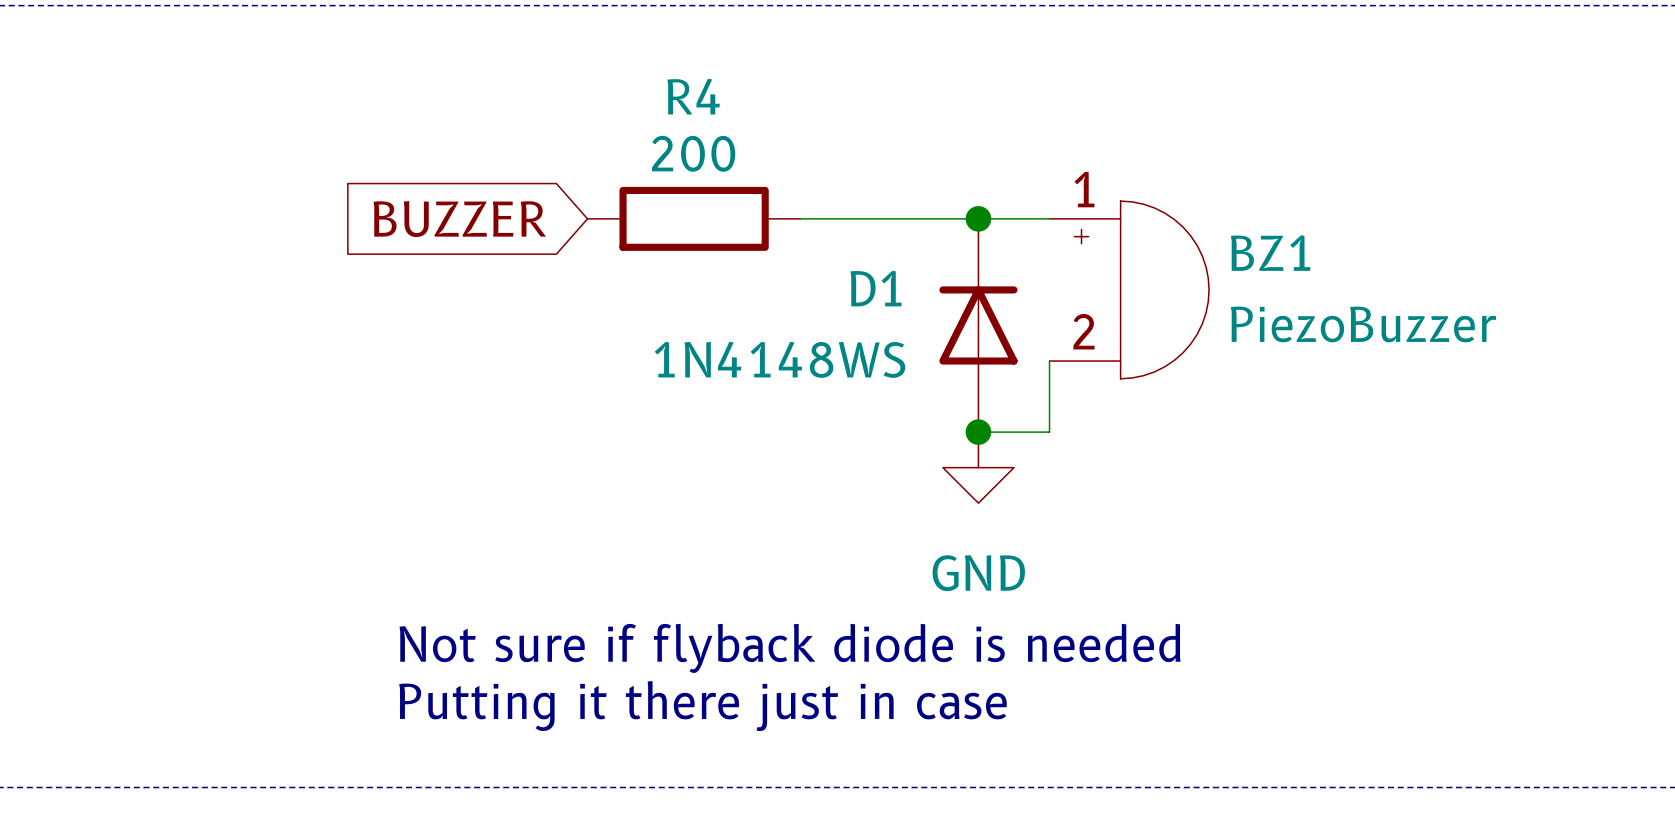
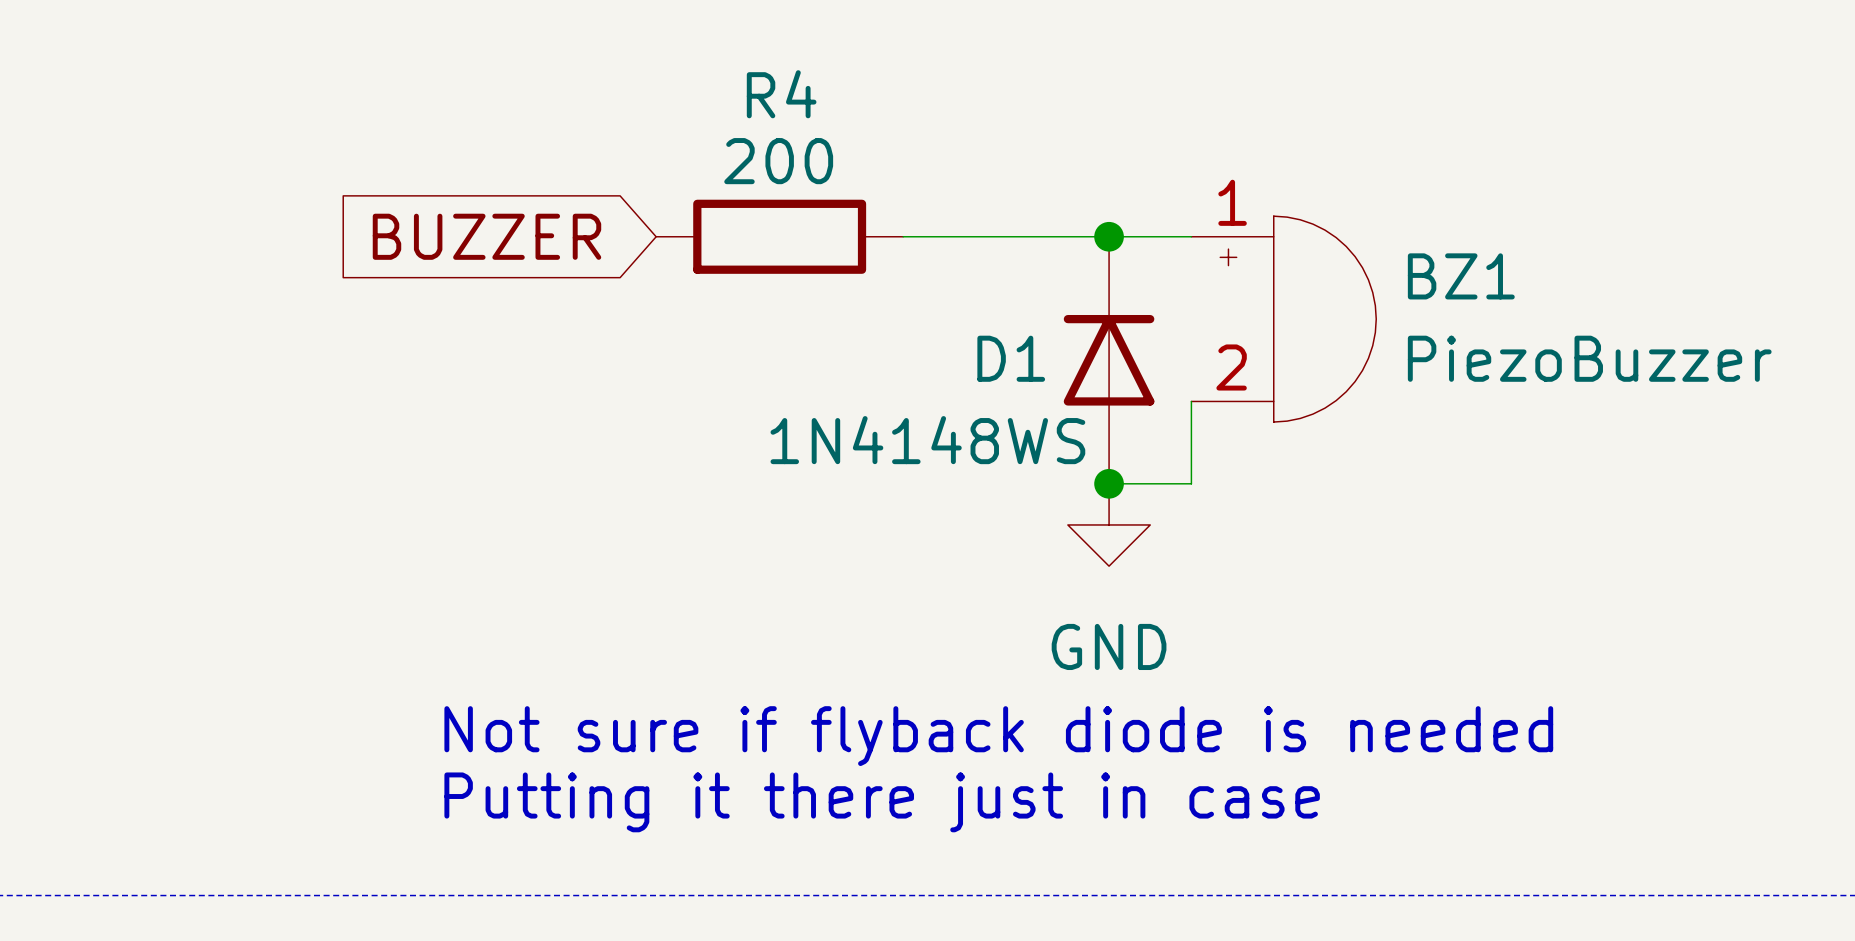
D1 name position: D1 (876, 288) -> D1 (1011, 358)
D1 value position: 1N4148WS (780, 359) -> 1N4148WS (927, 440)

